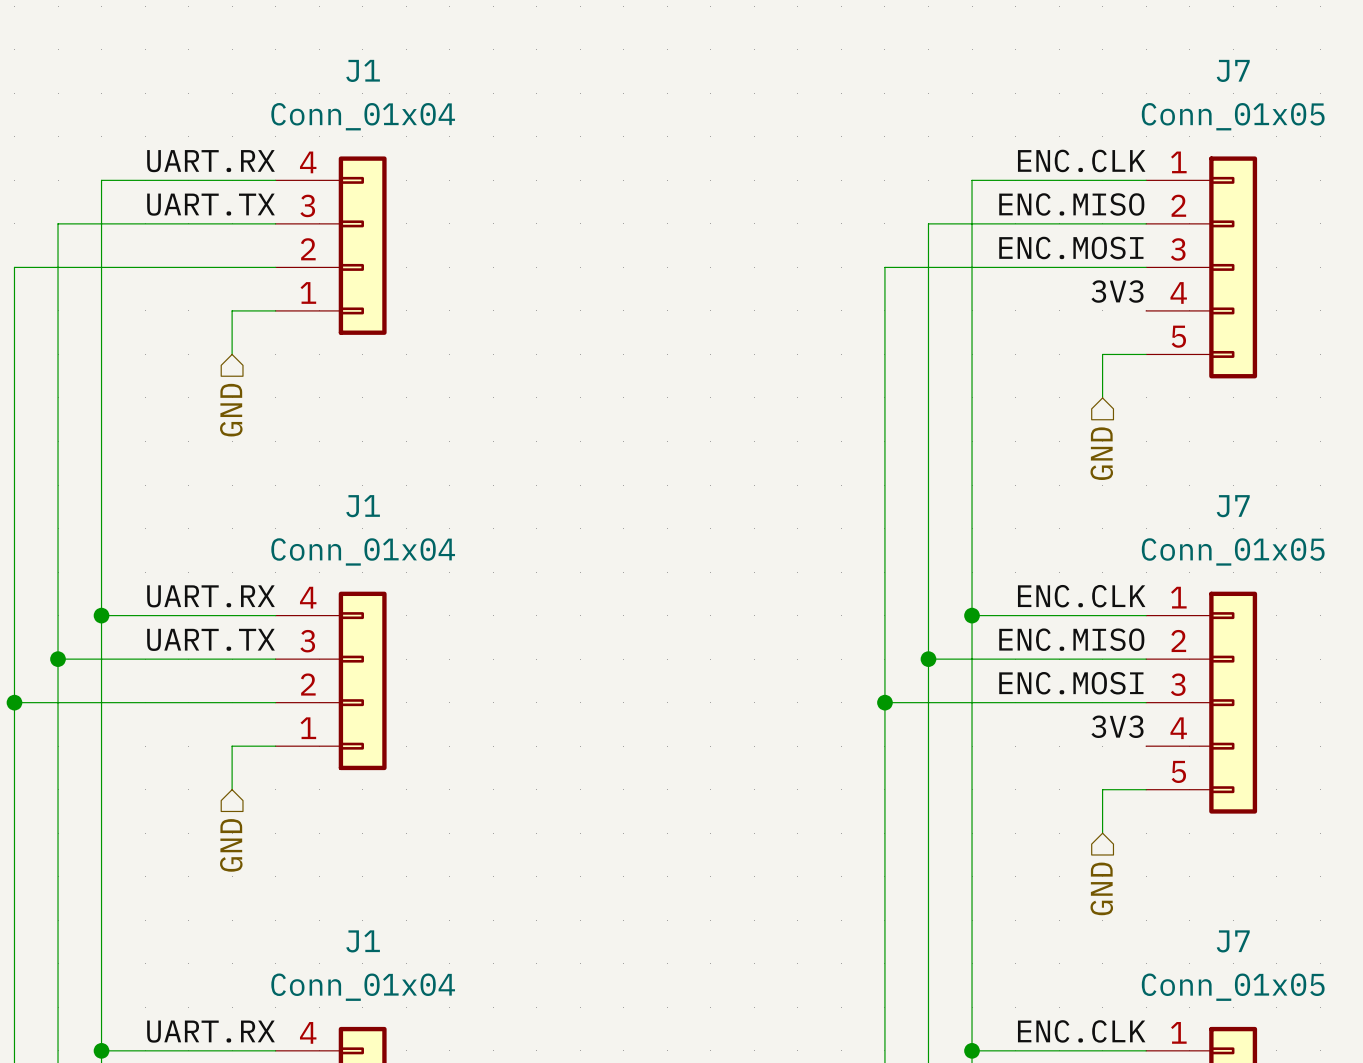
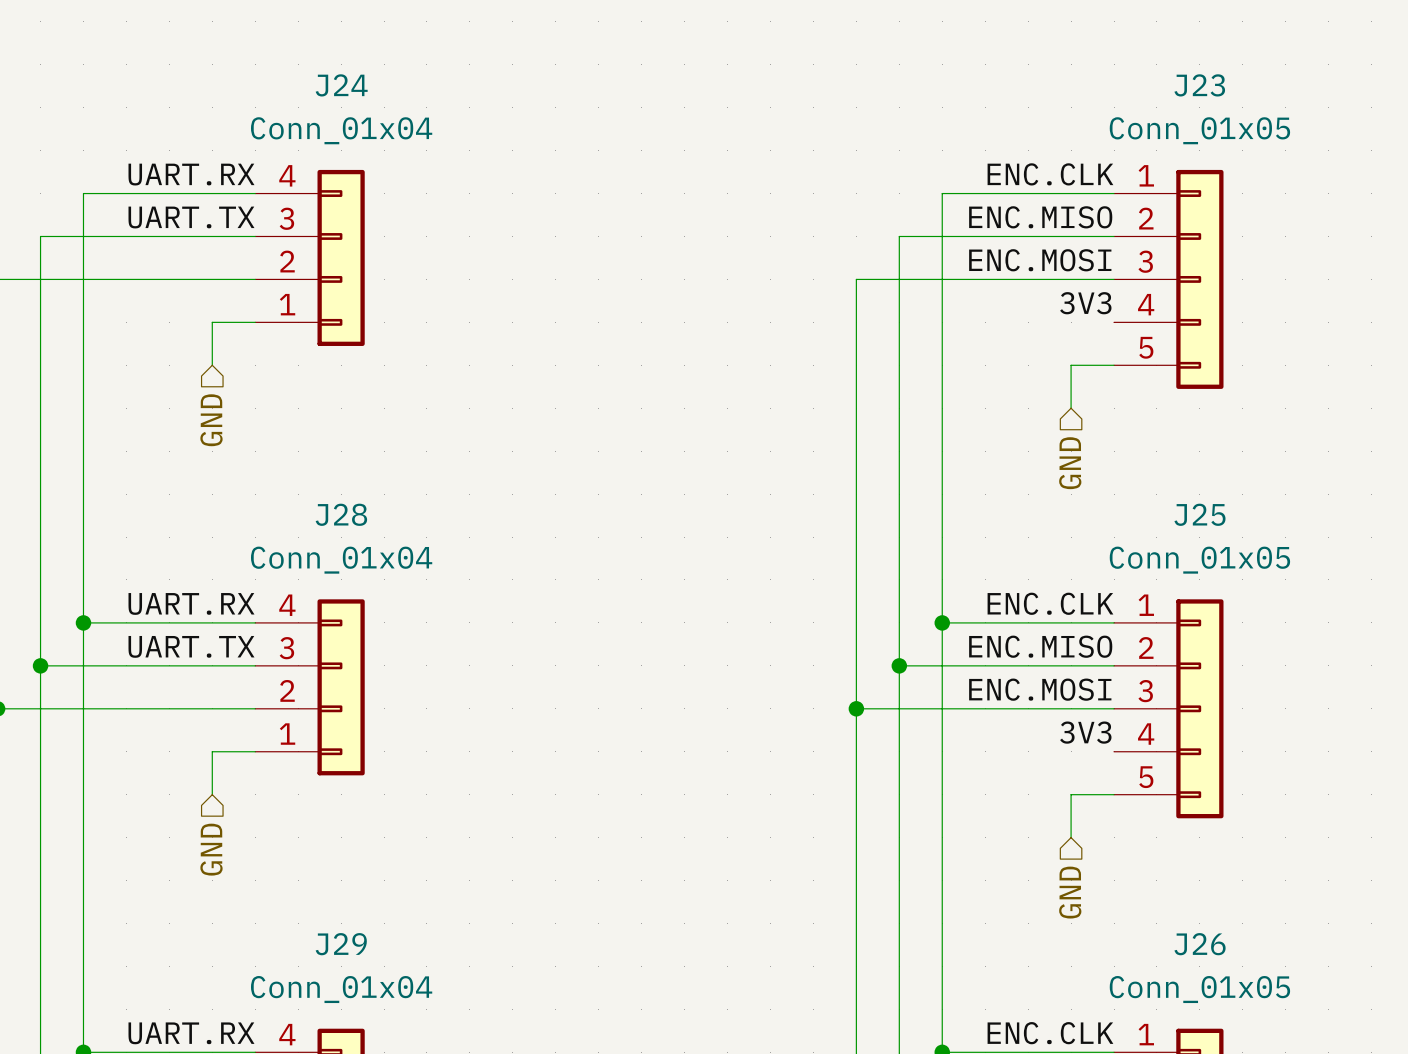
J1 name: J1 (363, 70) -> J24 (341, 85)
J7 name: J7 (1233, 70) -> J23 (1199, 85)
J1 name: J1 (363, 506) -> J28 (341, 514)
J7 name: J7 (1233, 506) -> J25 (1199, 514)
J1 name: J1 (363, 941) -> J29 (341, 944)
J7 name: J7 (1233, 941) -> J26 (1200, 944)

